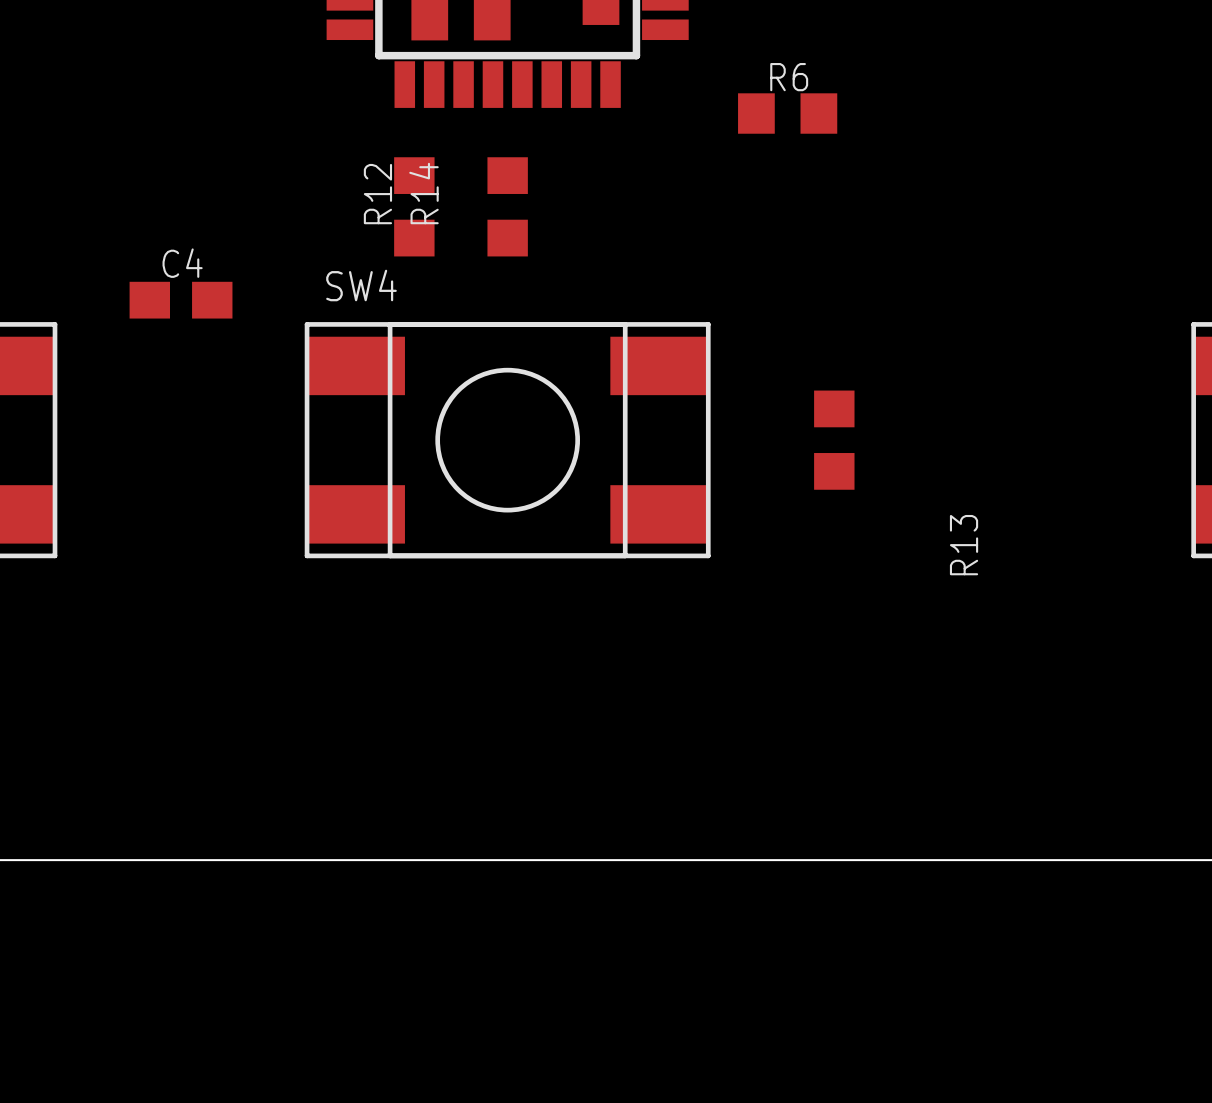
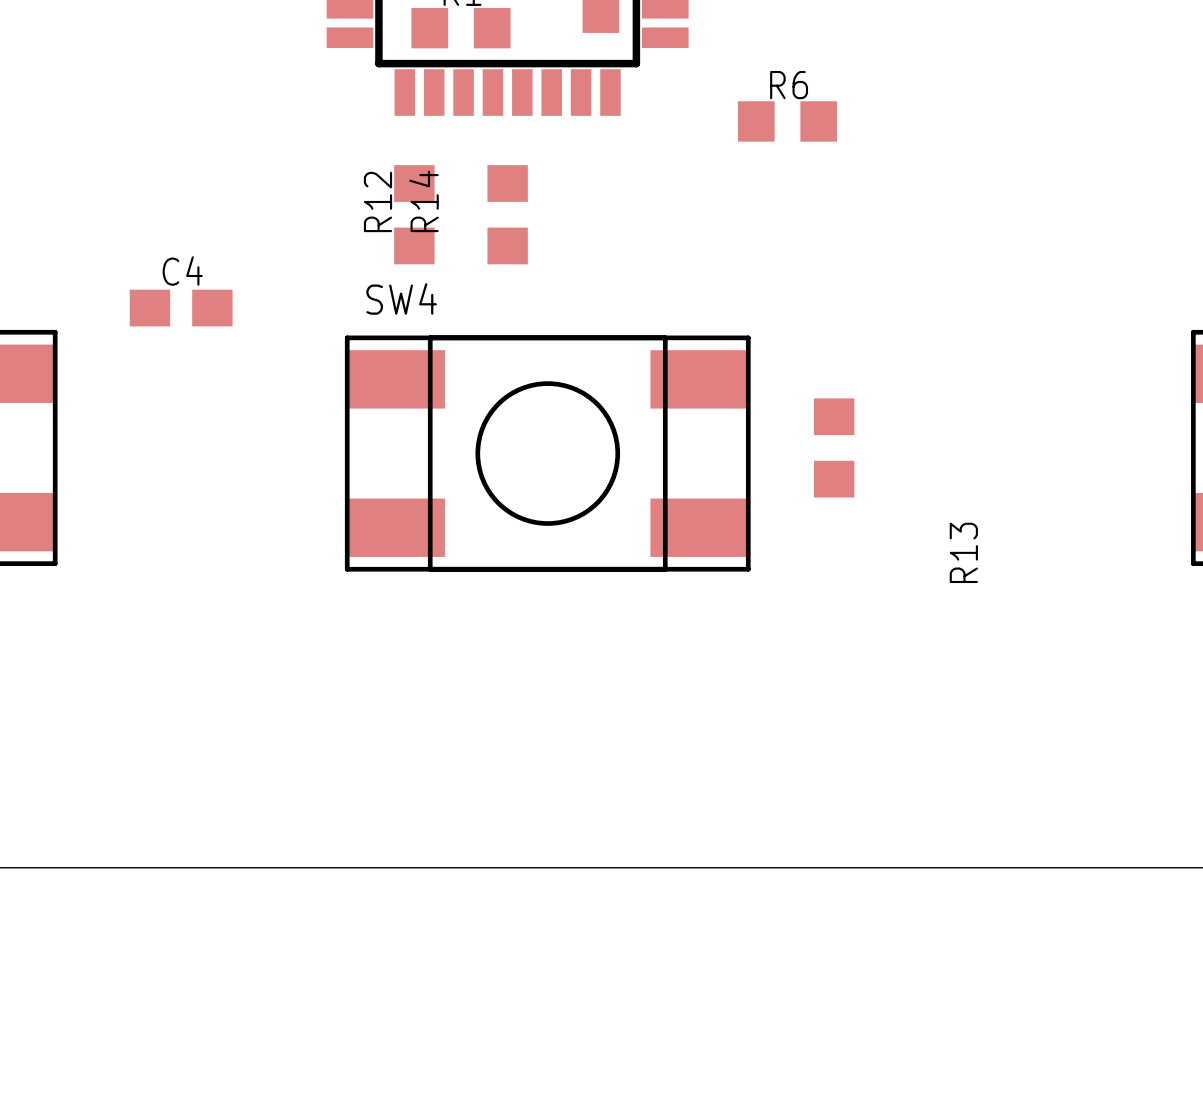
SW4 position: (507, 440) -> (547, 453)

